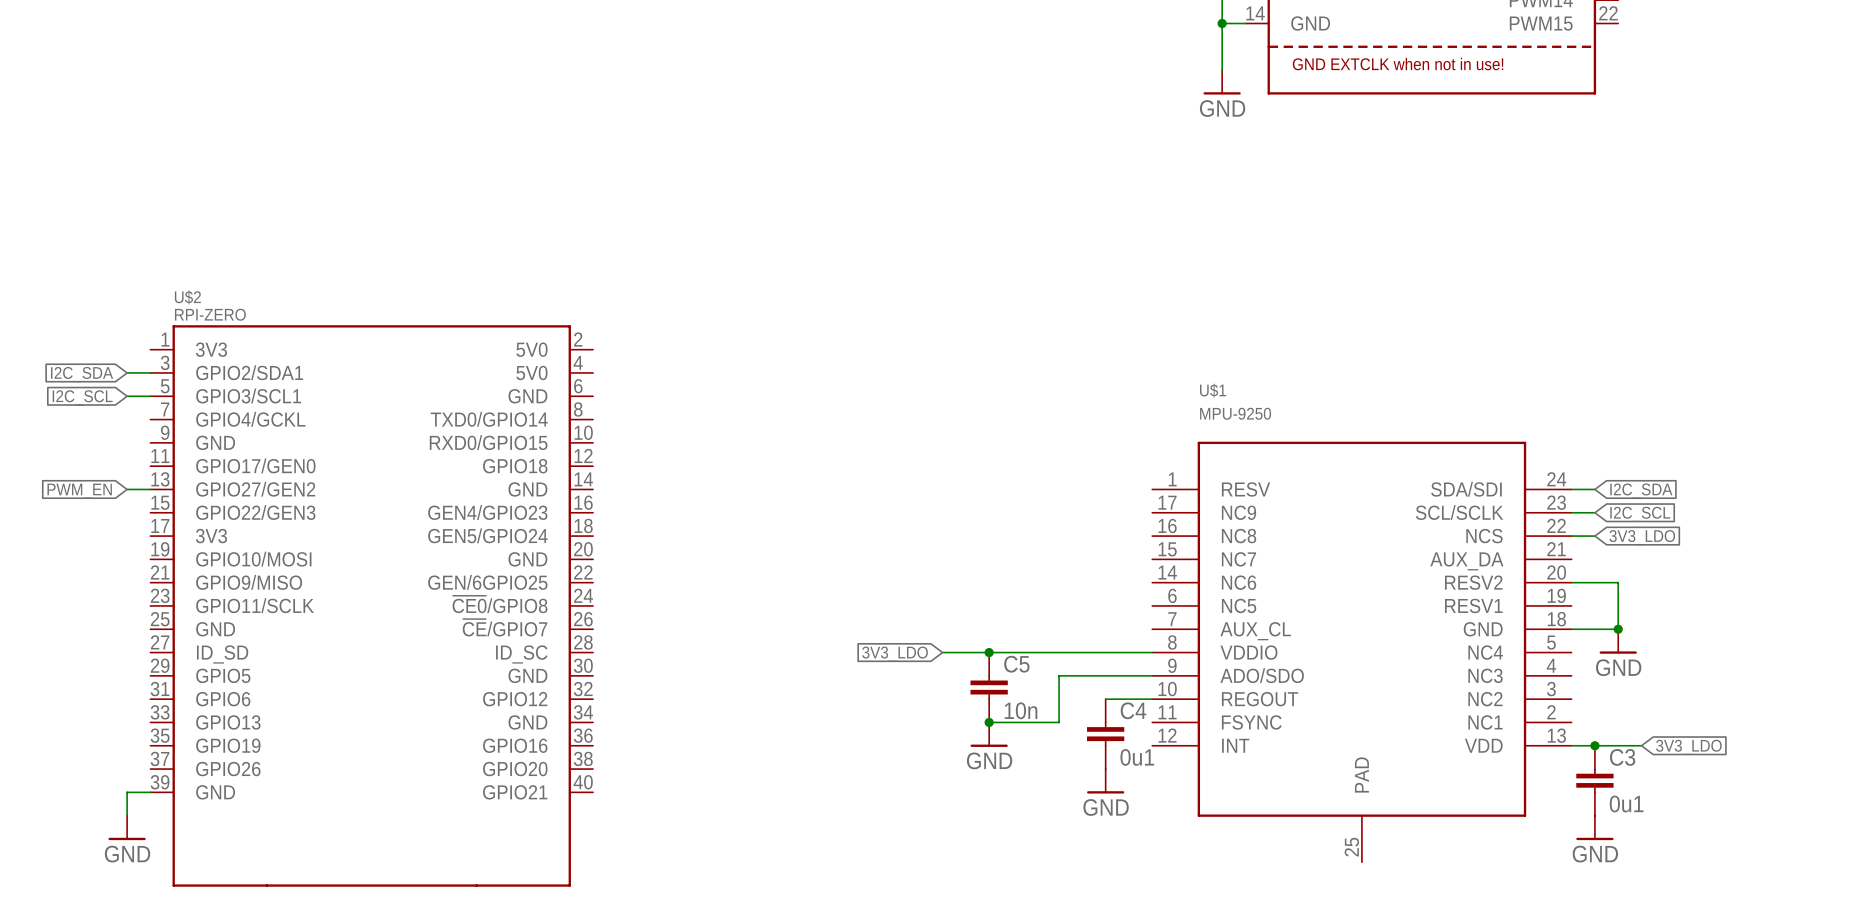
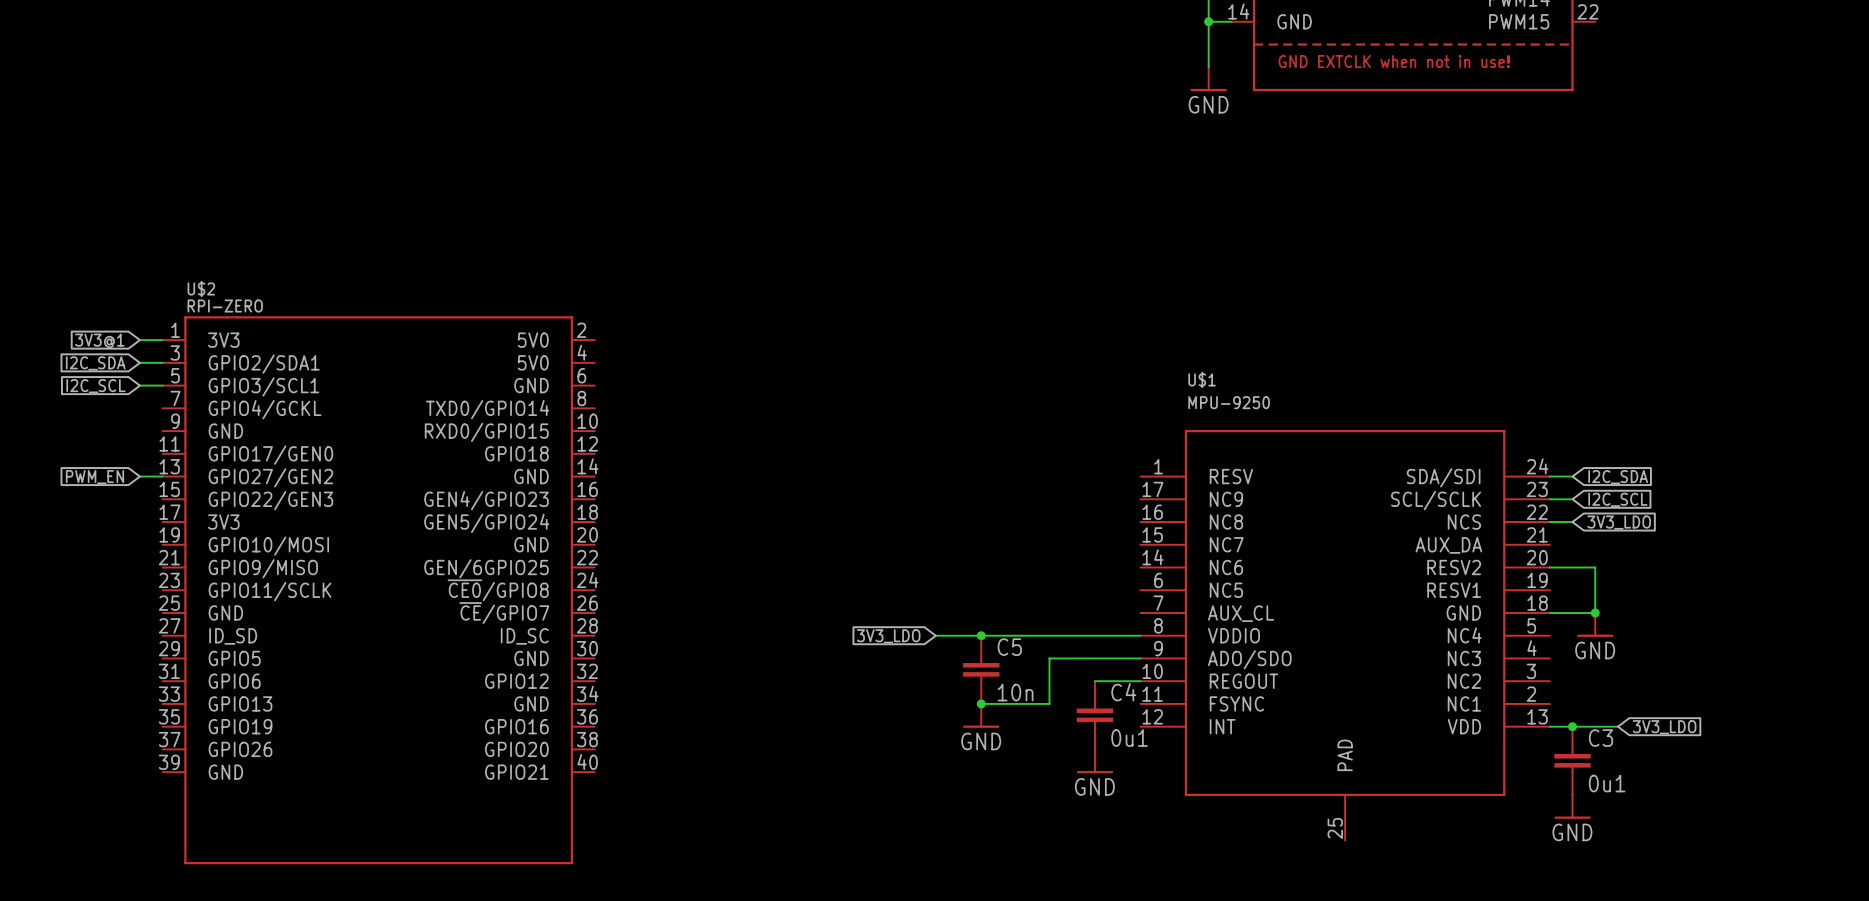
wire: none -> (139, 340) (162, 340)
global label: none -> 3V3@1 (99, 340)
wire: (150, 792) (127, 792) (127, 815) -> none
power symbol: GND (127, 827) -> none

